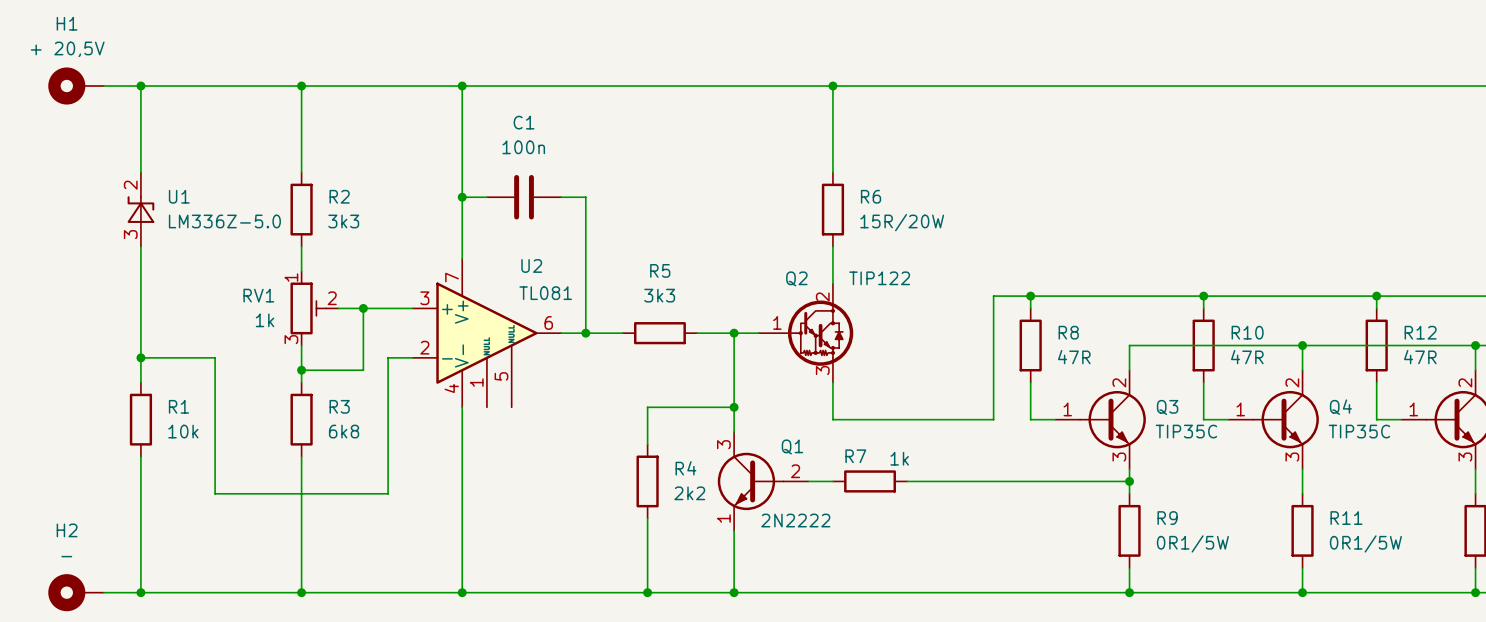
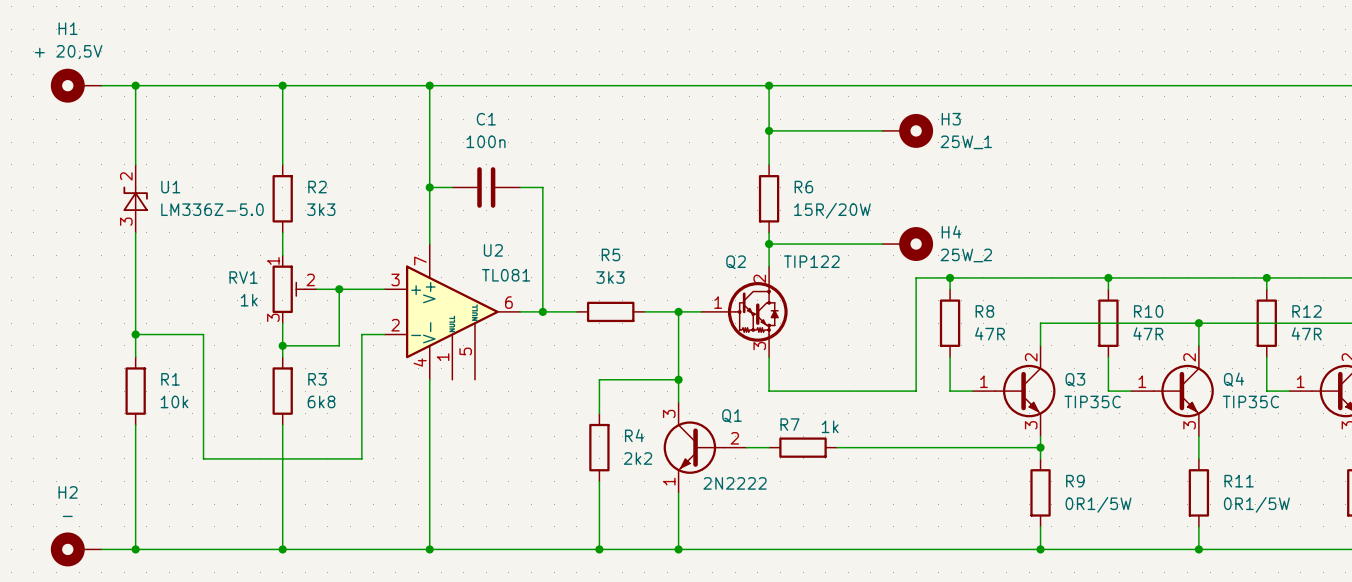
wire: none -> (769, 130) (882, 130)
junction: none -> (769, 130)
H3: none -> 25W_1 (907, 130)
wire: none -> (769, 244) (882, 244)
junction: none -> (769, 244)
H4: none -> 25W_2 (907, 244)

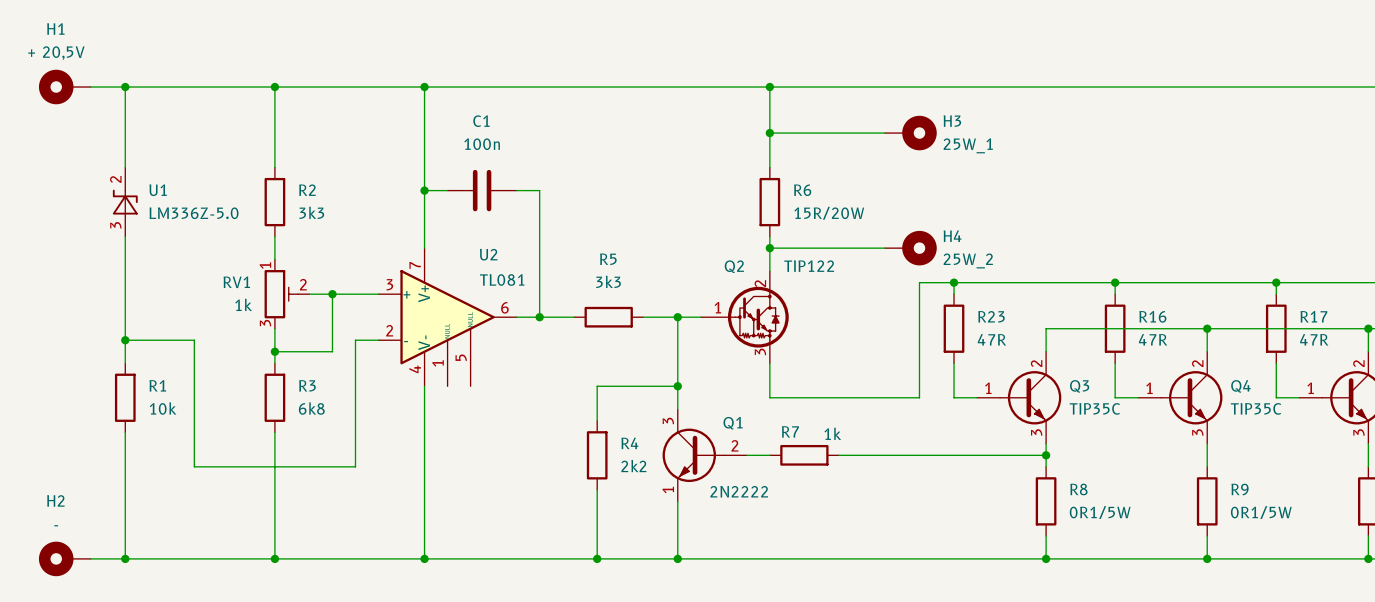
R8 name: R8 (984, 311) -> R23 (991, 316)
R10 name: R10 (1148, 311) -> R16 (1152, 316)
R12 name: R12 (1306, 311) -> R17 (1313, 316)
R9 name: R9 (1075, 481) -> R8 (1078, 489)
R11 name: R11 (1239, 481) -> R9 (1240, 489)

